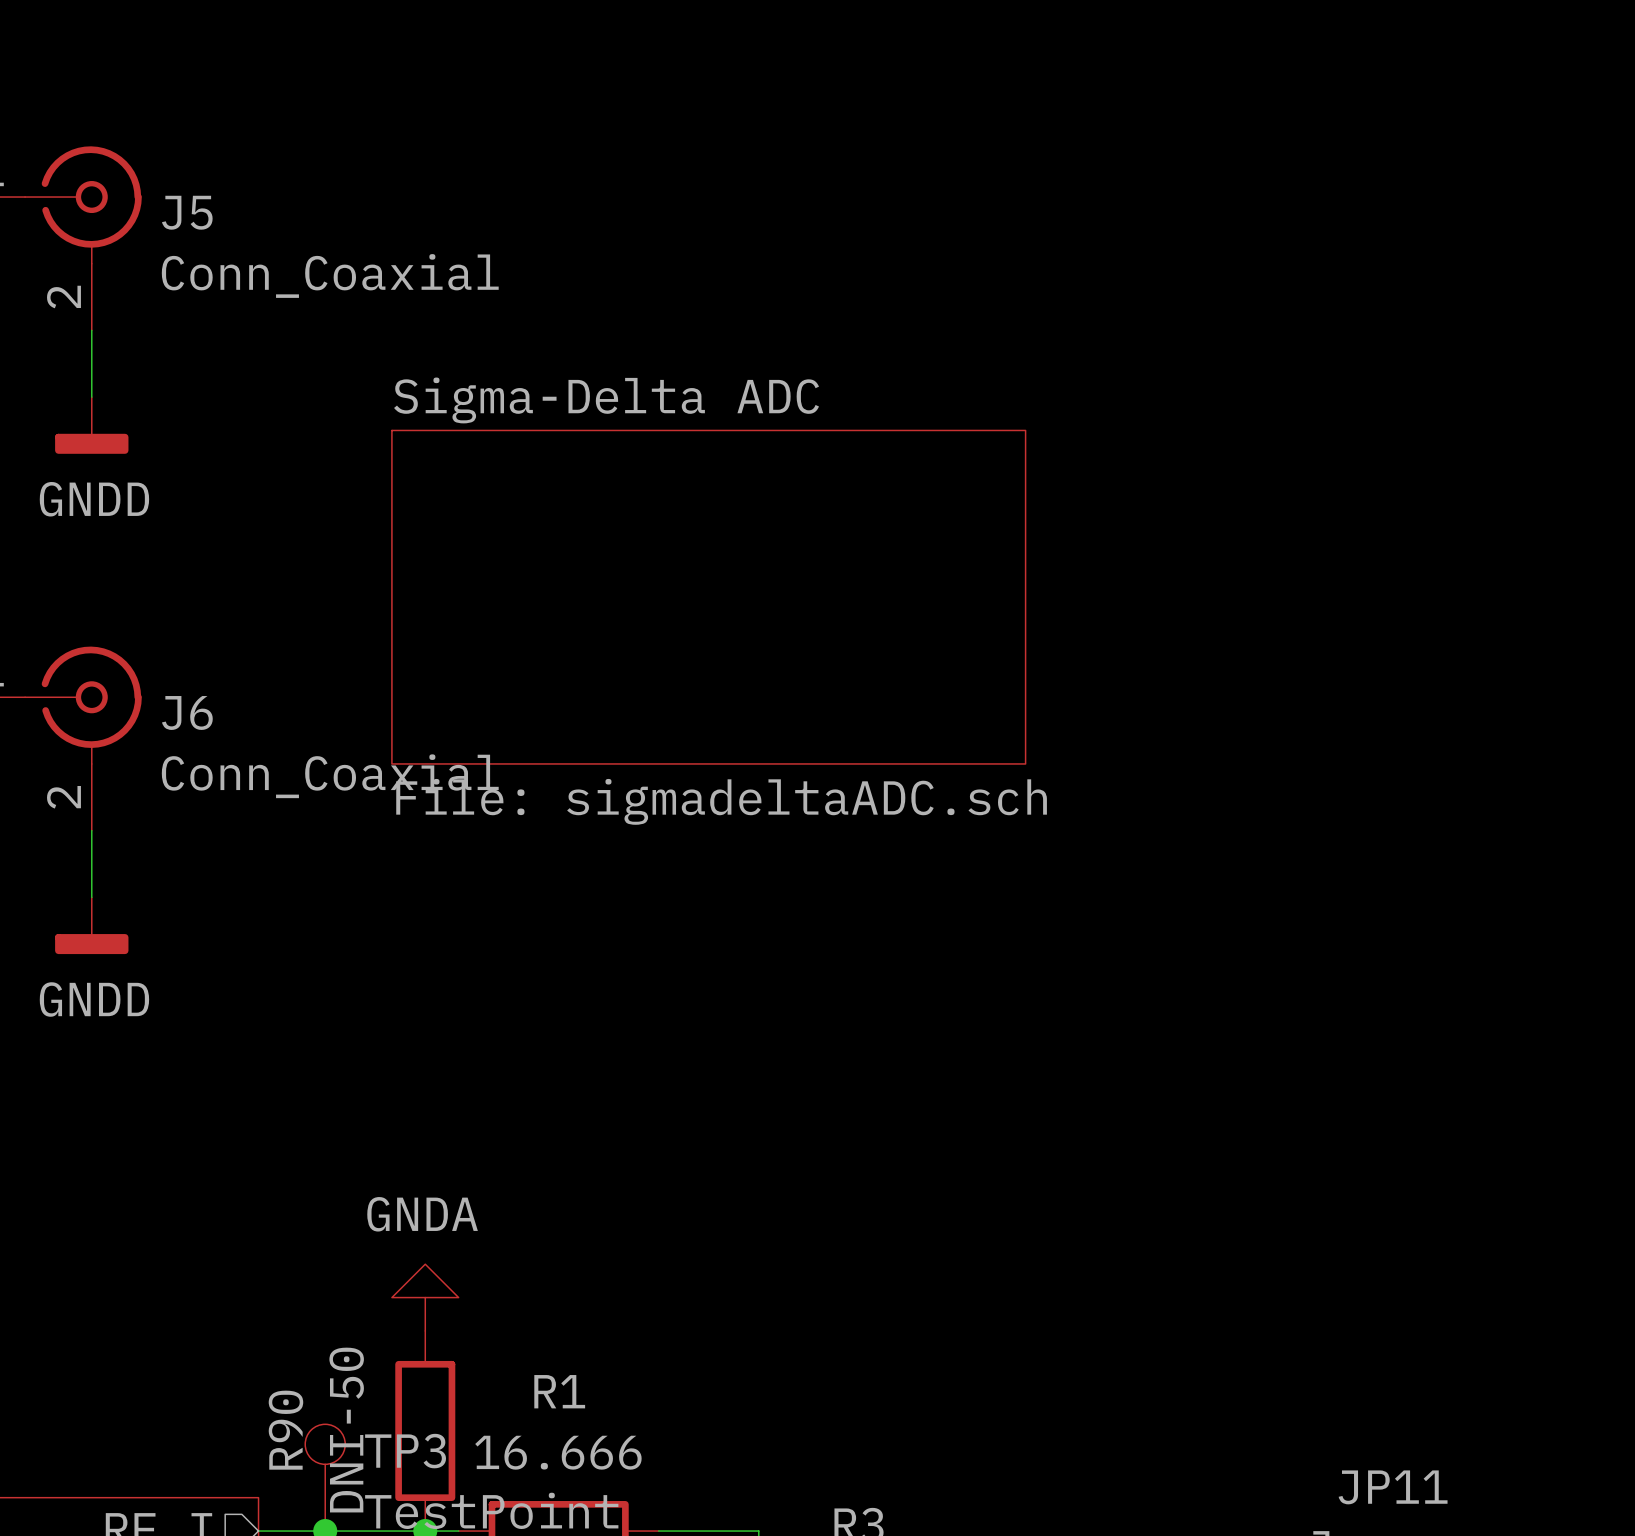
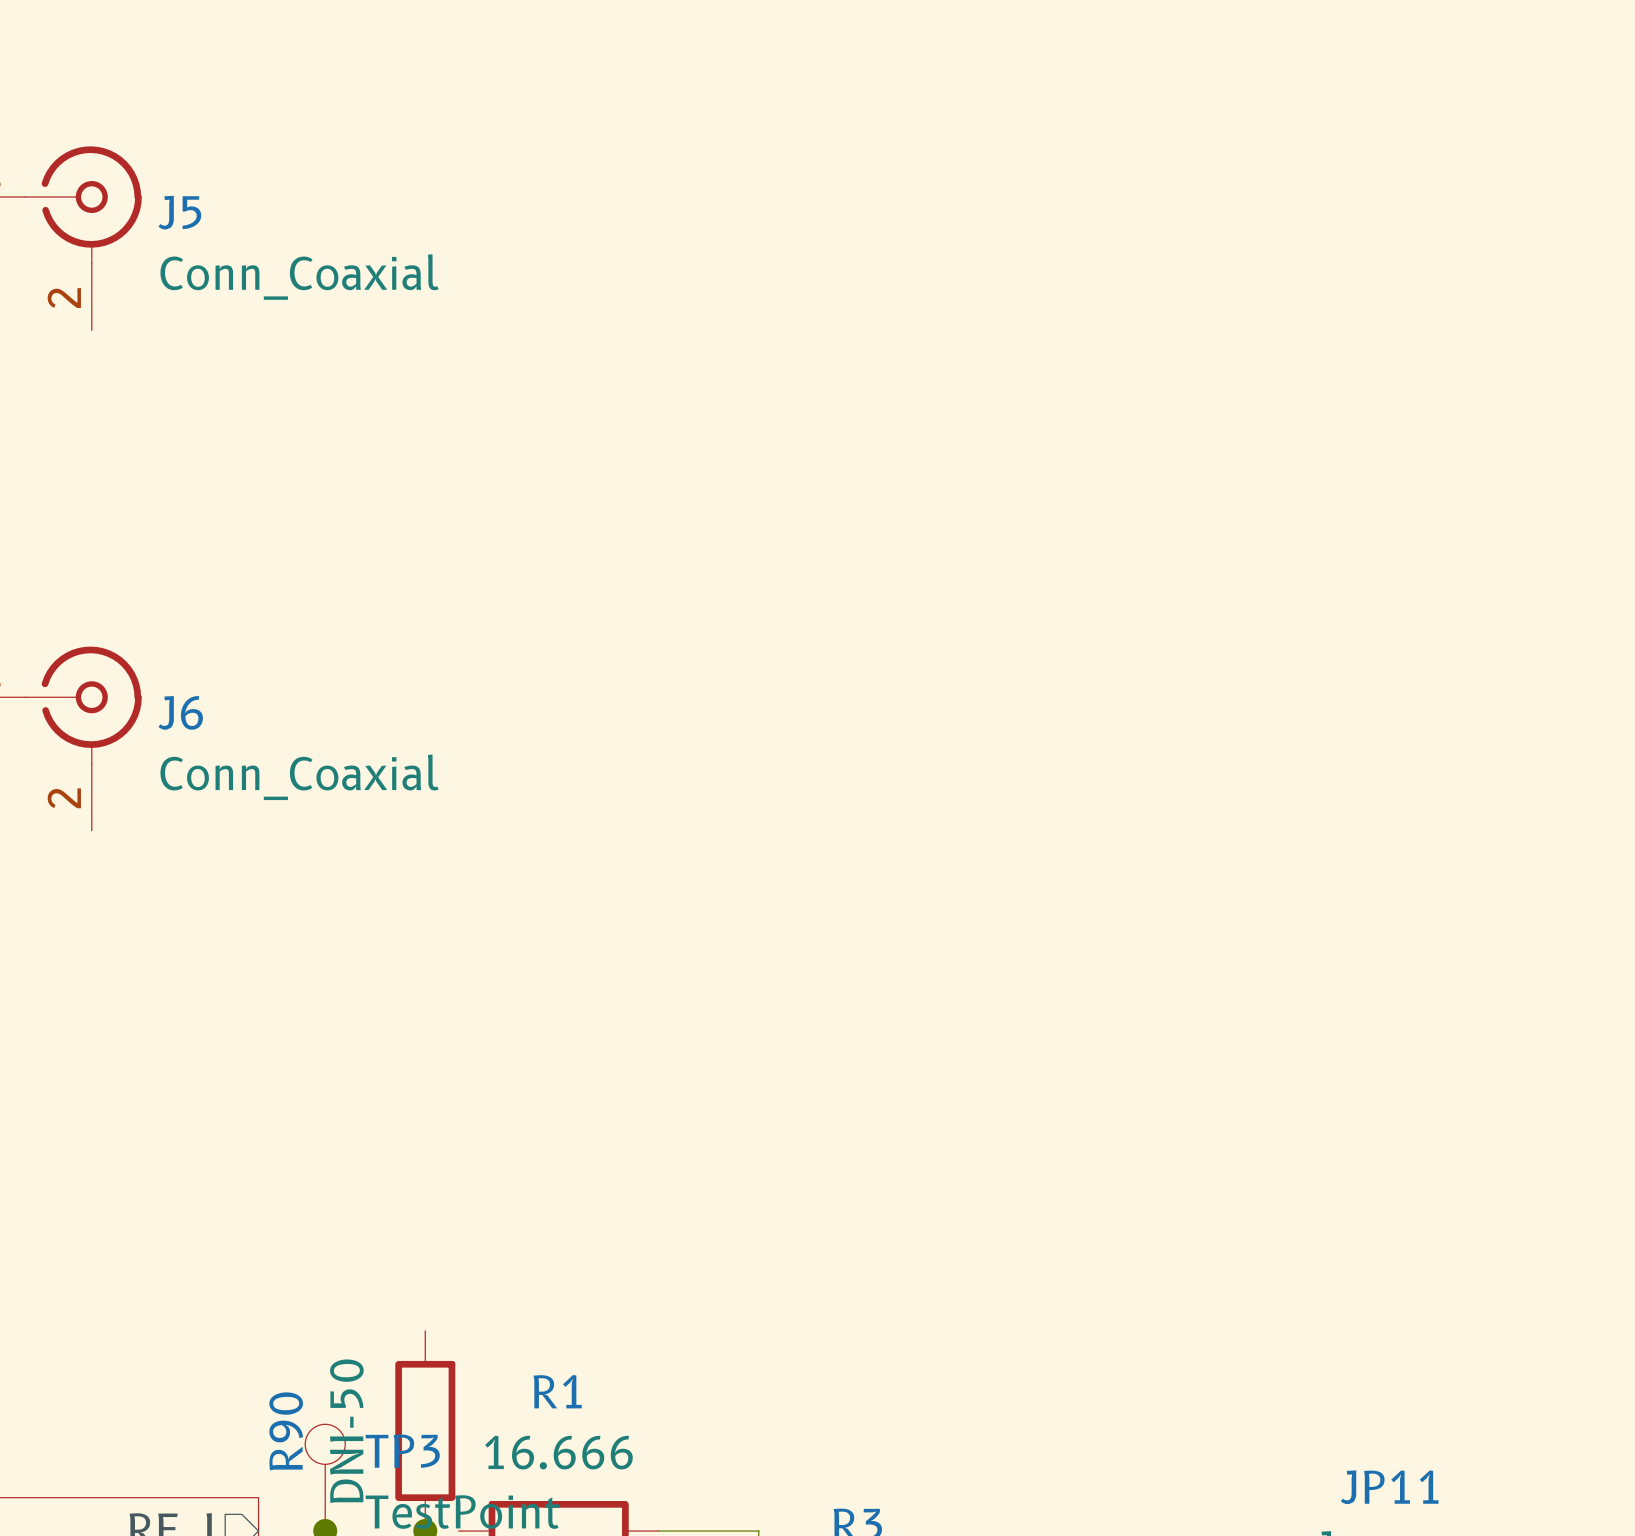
wire: (91, 330) (91, 397) -> none
power symbol: GNDD (91, 425) -> none
sheet Sigma-Delta ADC: File: sigmadeltaADC.sch (708, 597) -> none
wire: (91, 830) (91, 897) -> none
power symbol: GNDD (91, 925) -> none
power symbol: GNDA (425, 1297) -> none
wire: (258, 1531) (458, 1531) -> none

